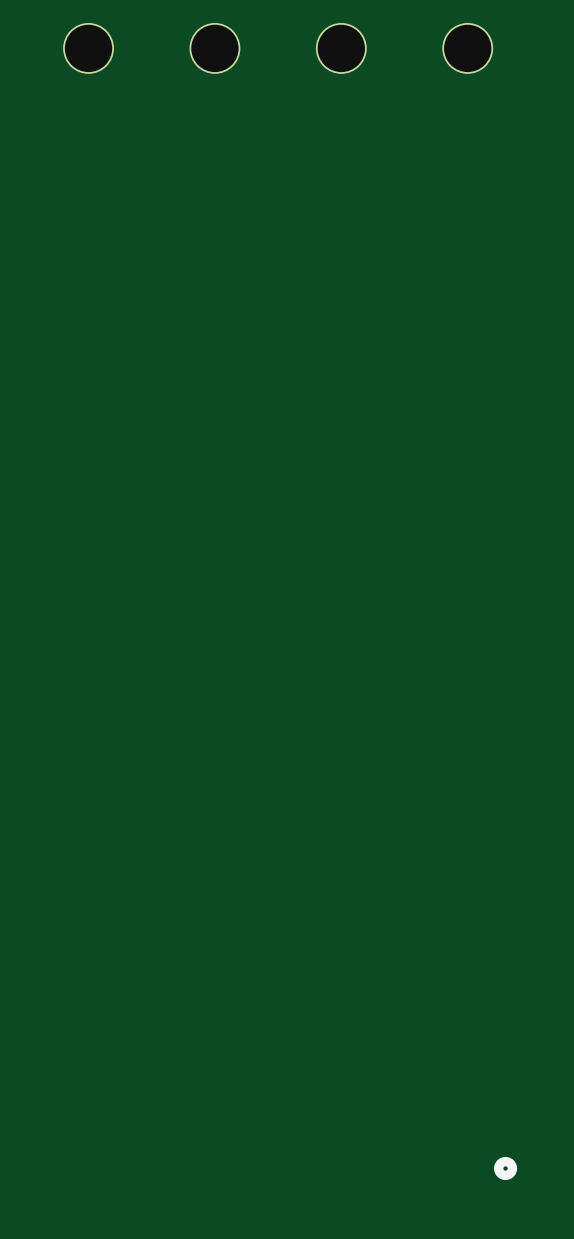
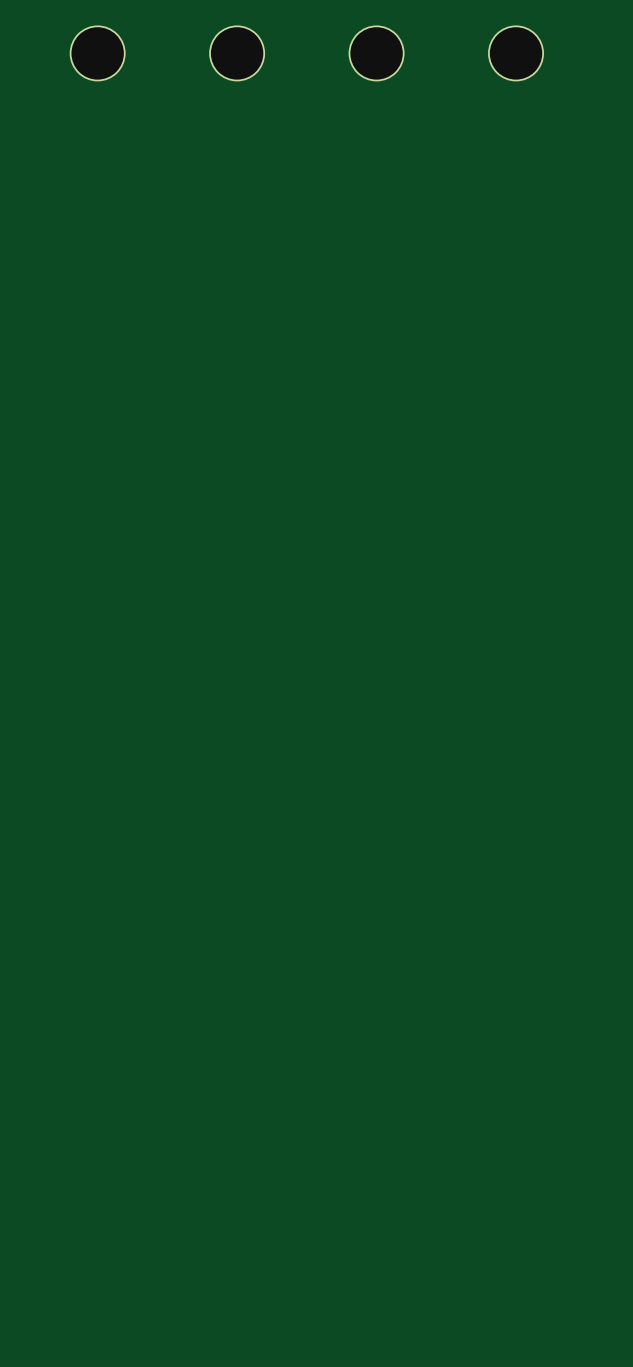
part: (505, 1168) -> none

